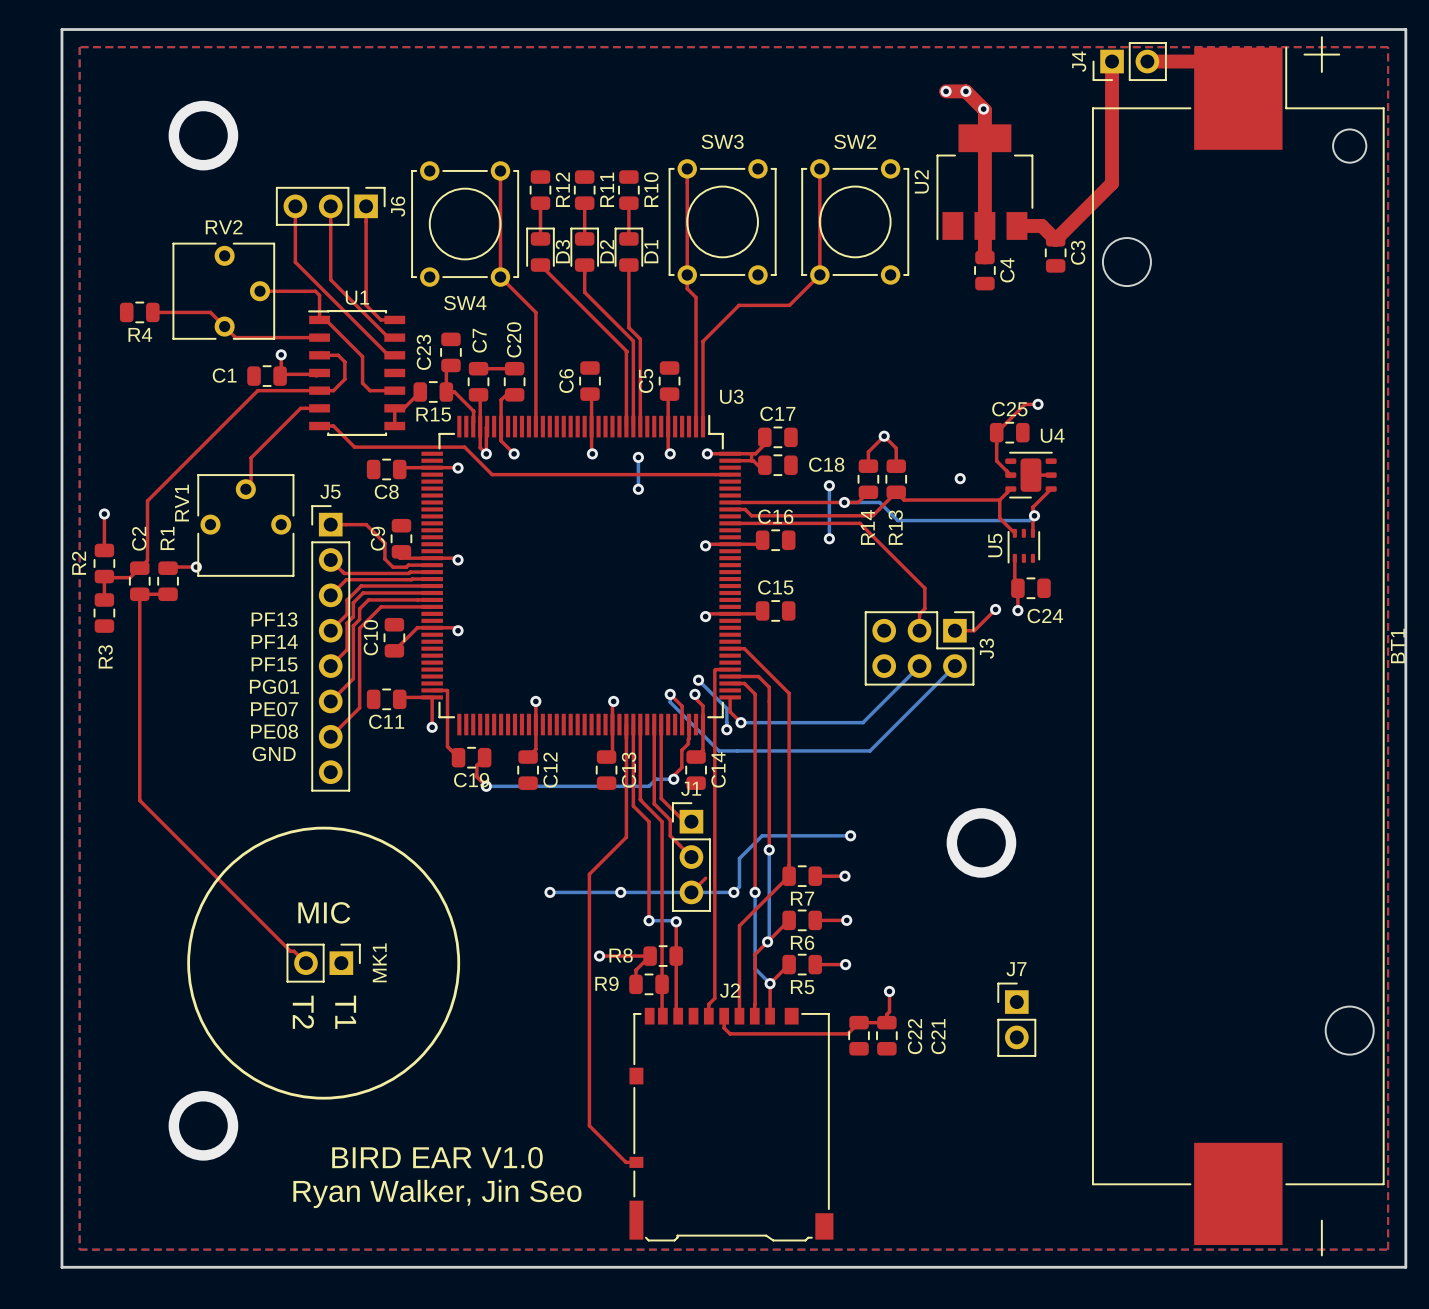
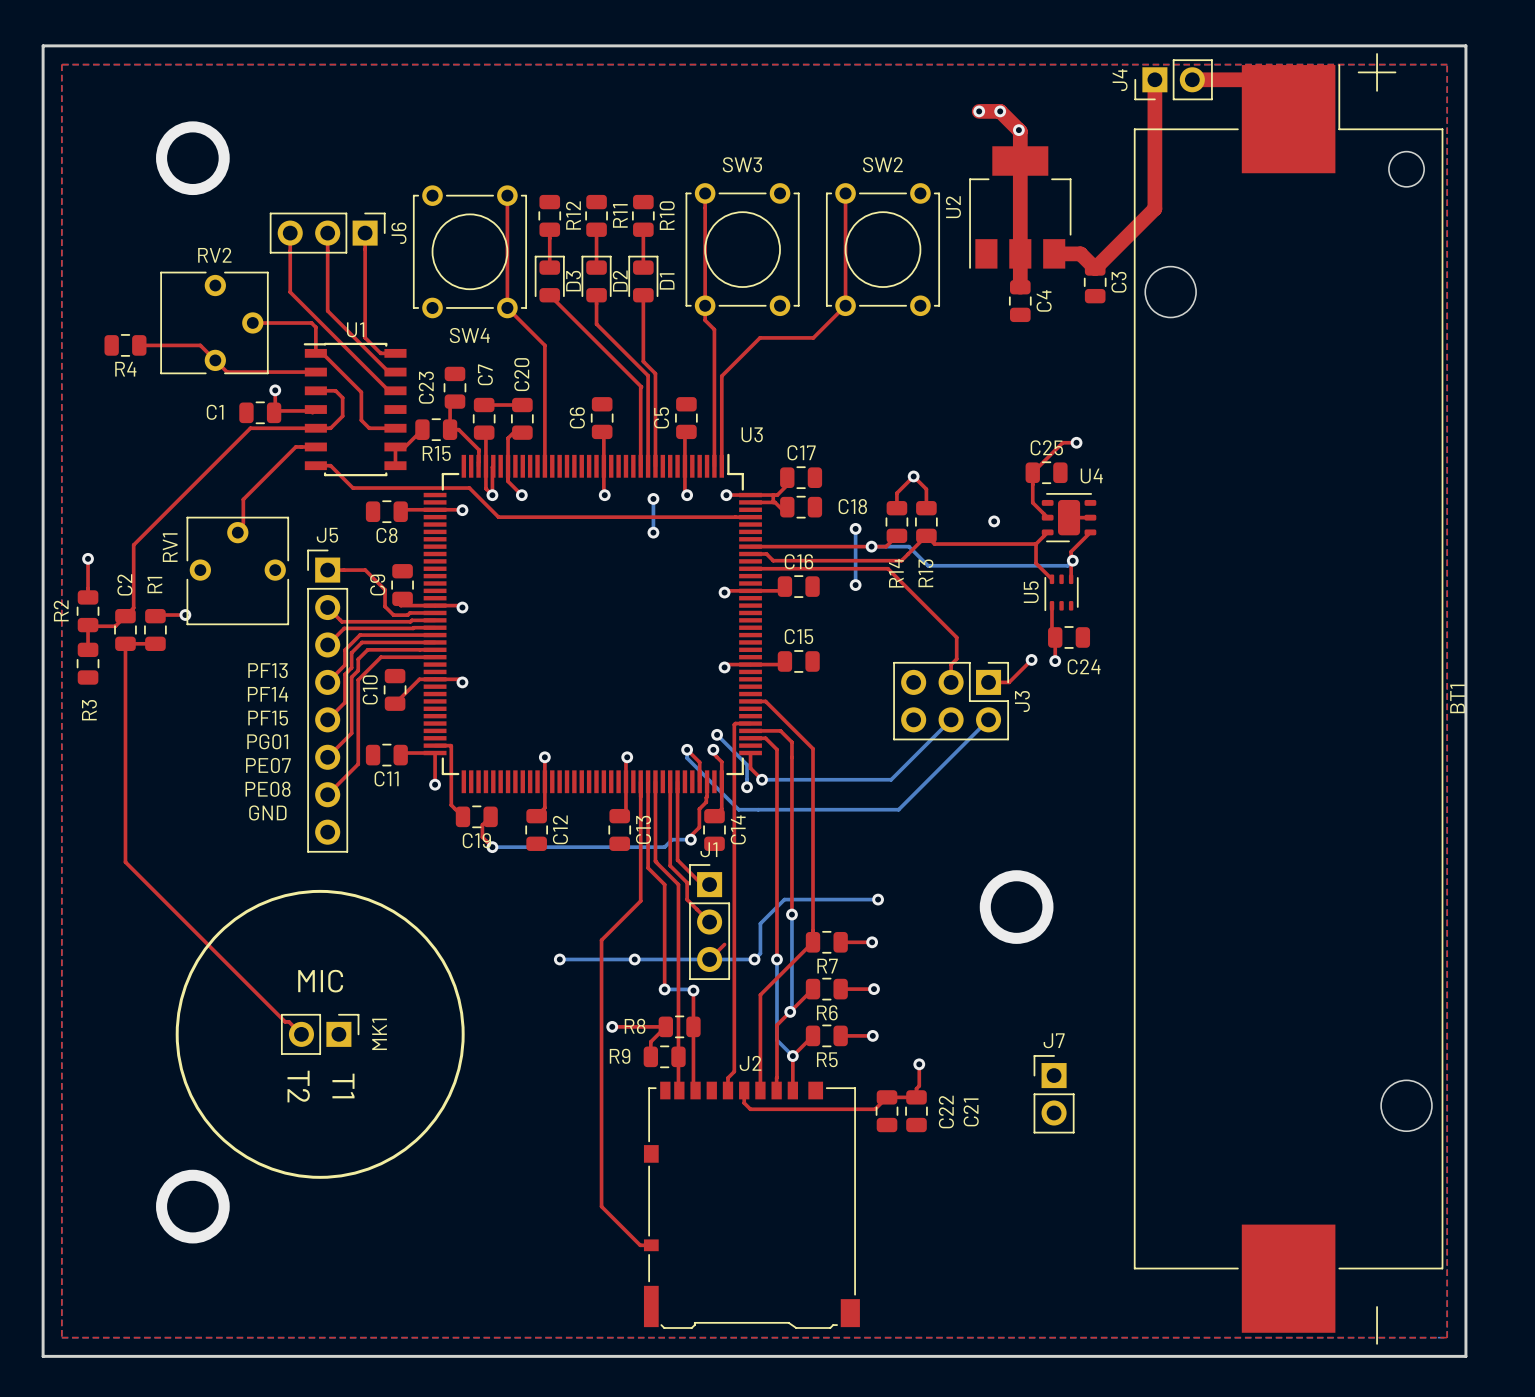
text: BIRD EAR V1.0 (437, 1157) -> none
text: Ryan Walker, Jin Seo (437, 1193) -> none

